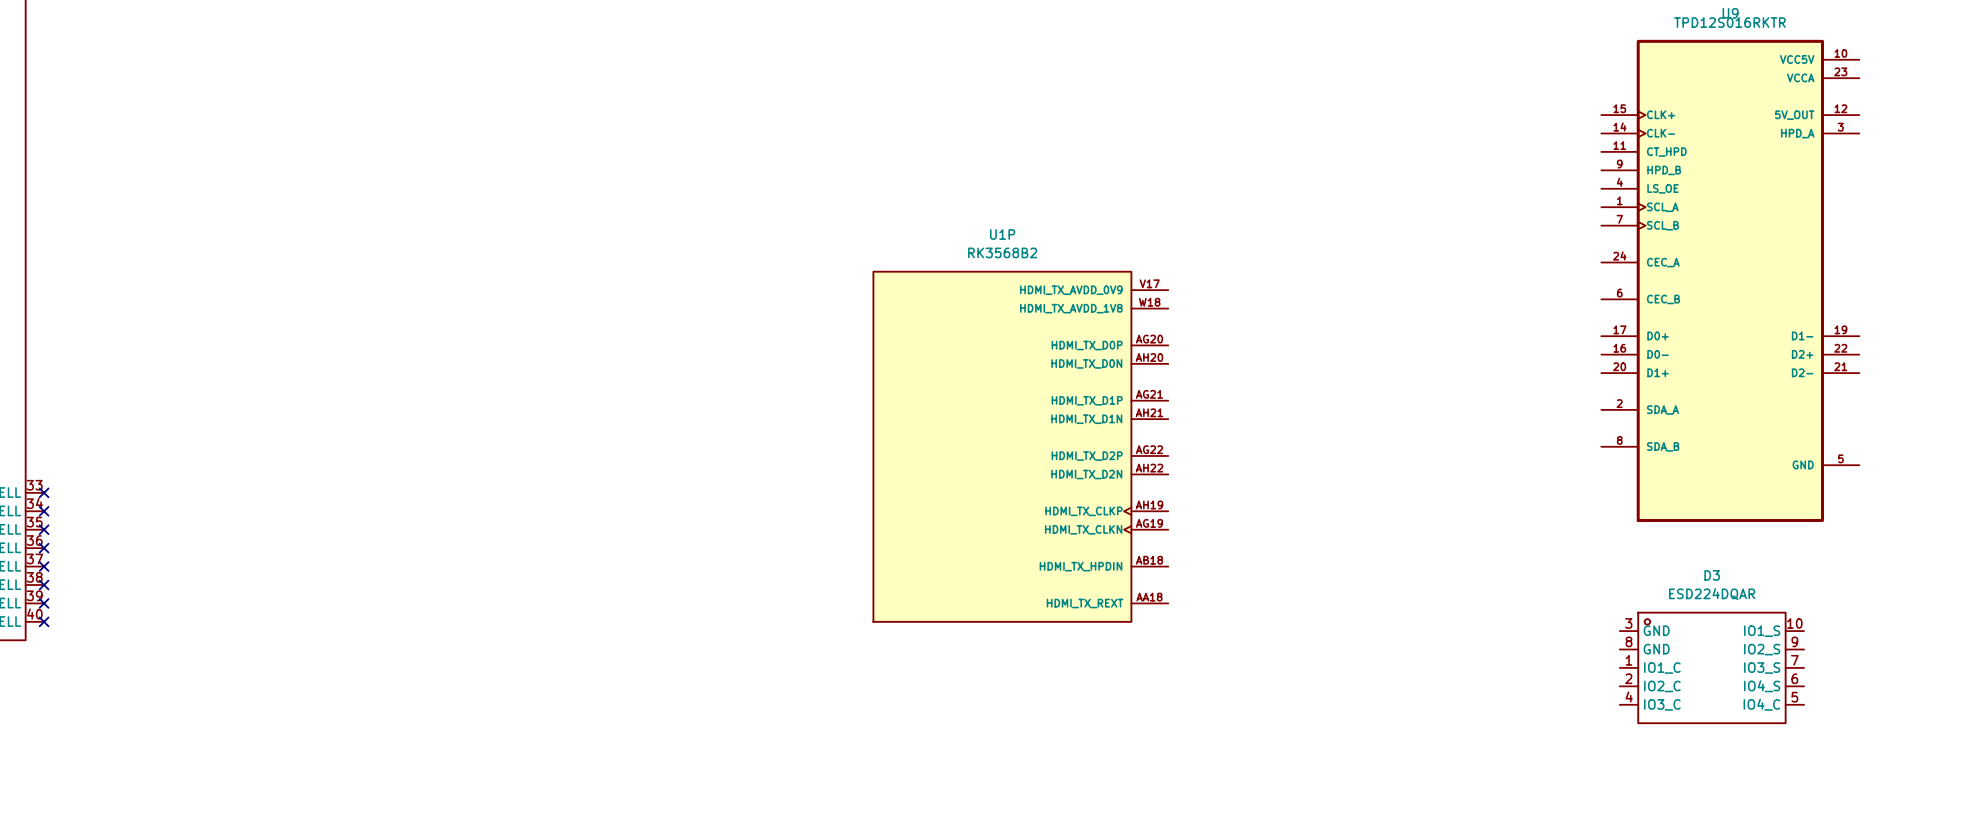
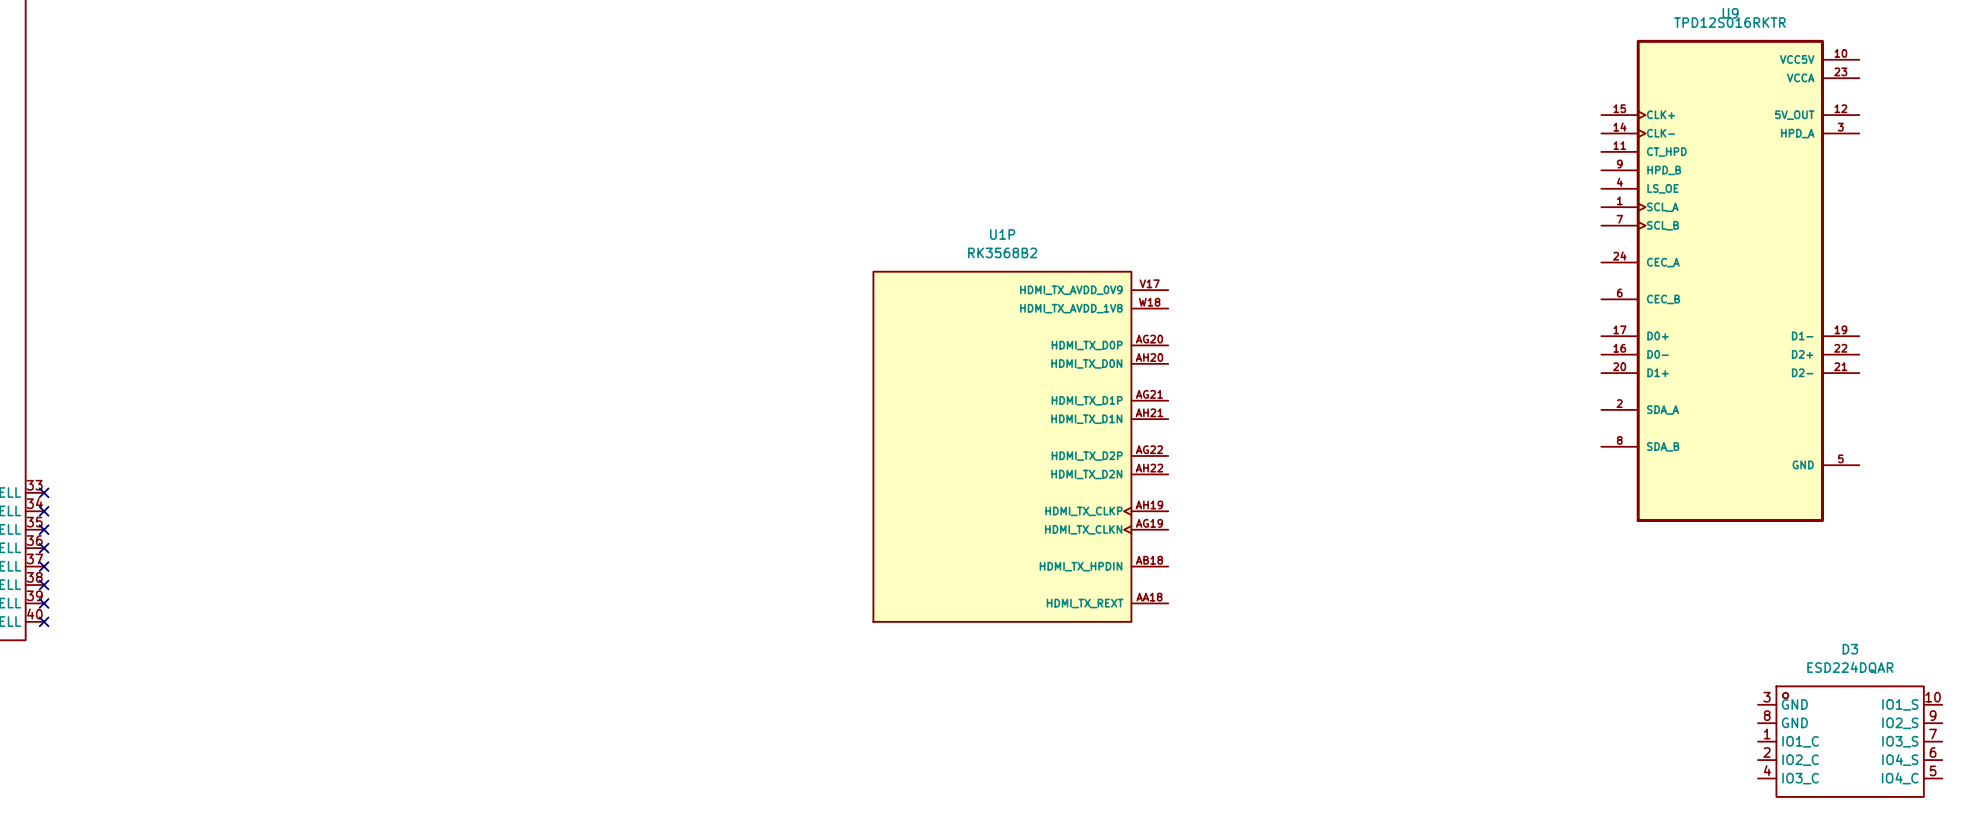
D3 position: (1711, 667) -> (1850, 741)

